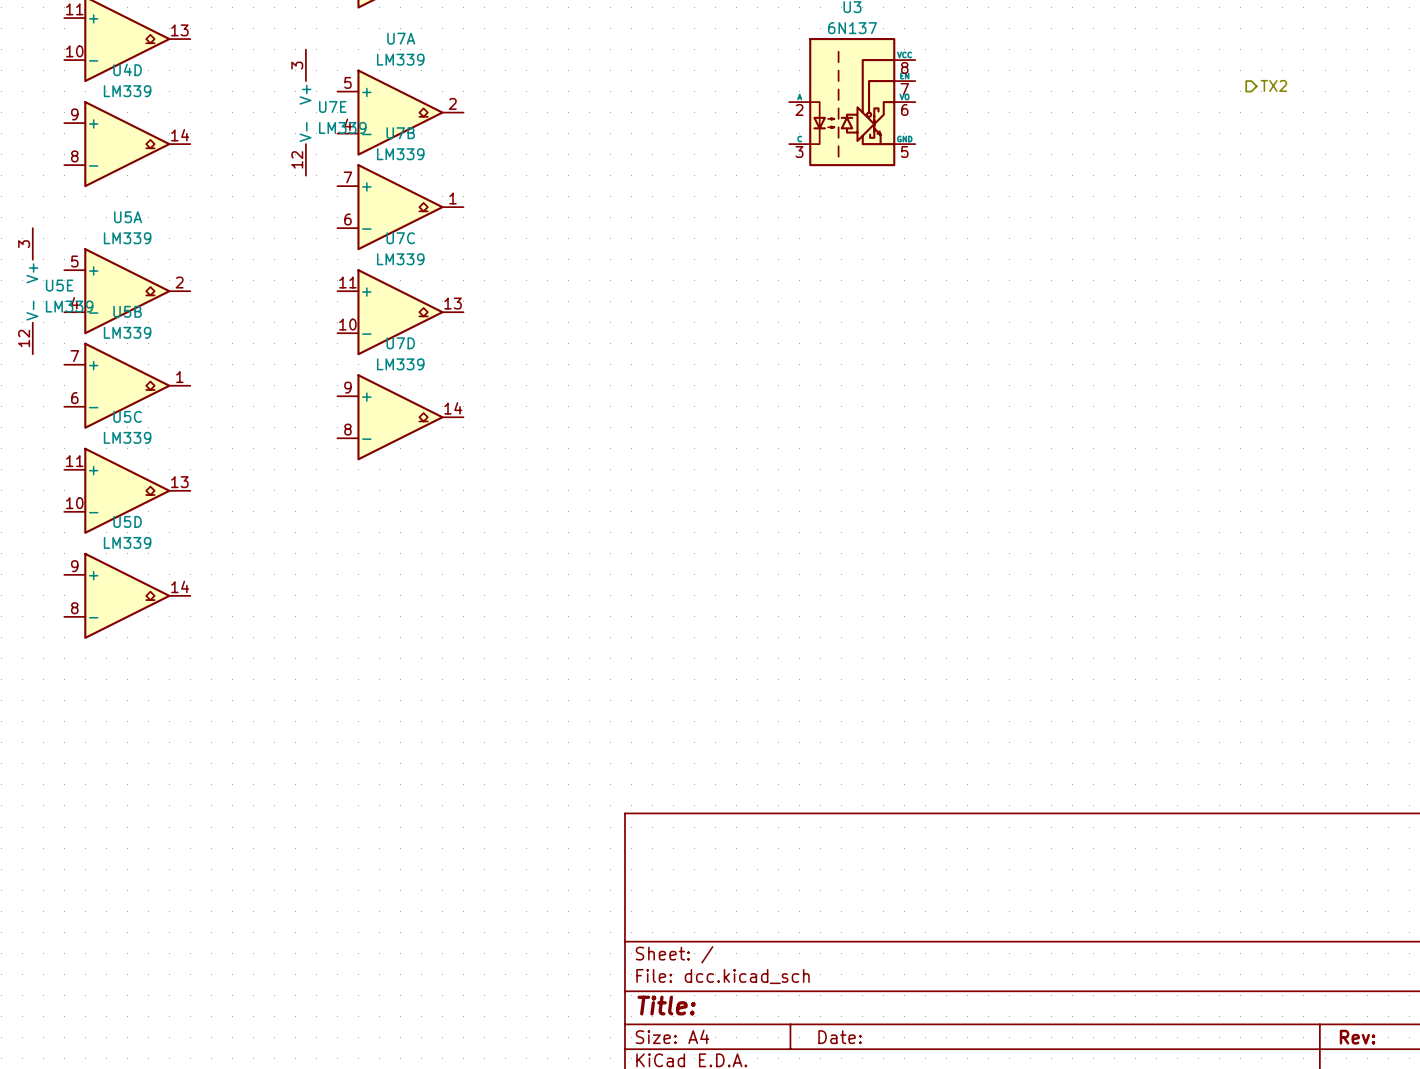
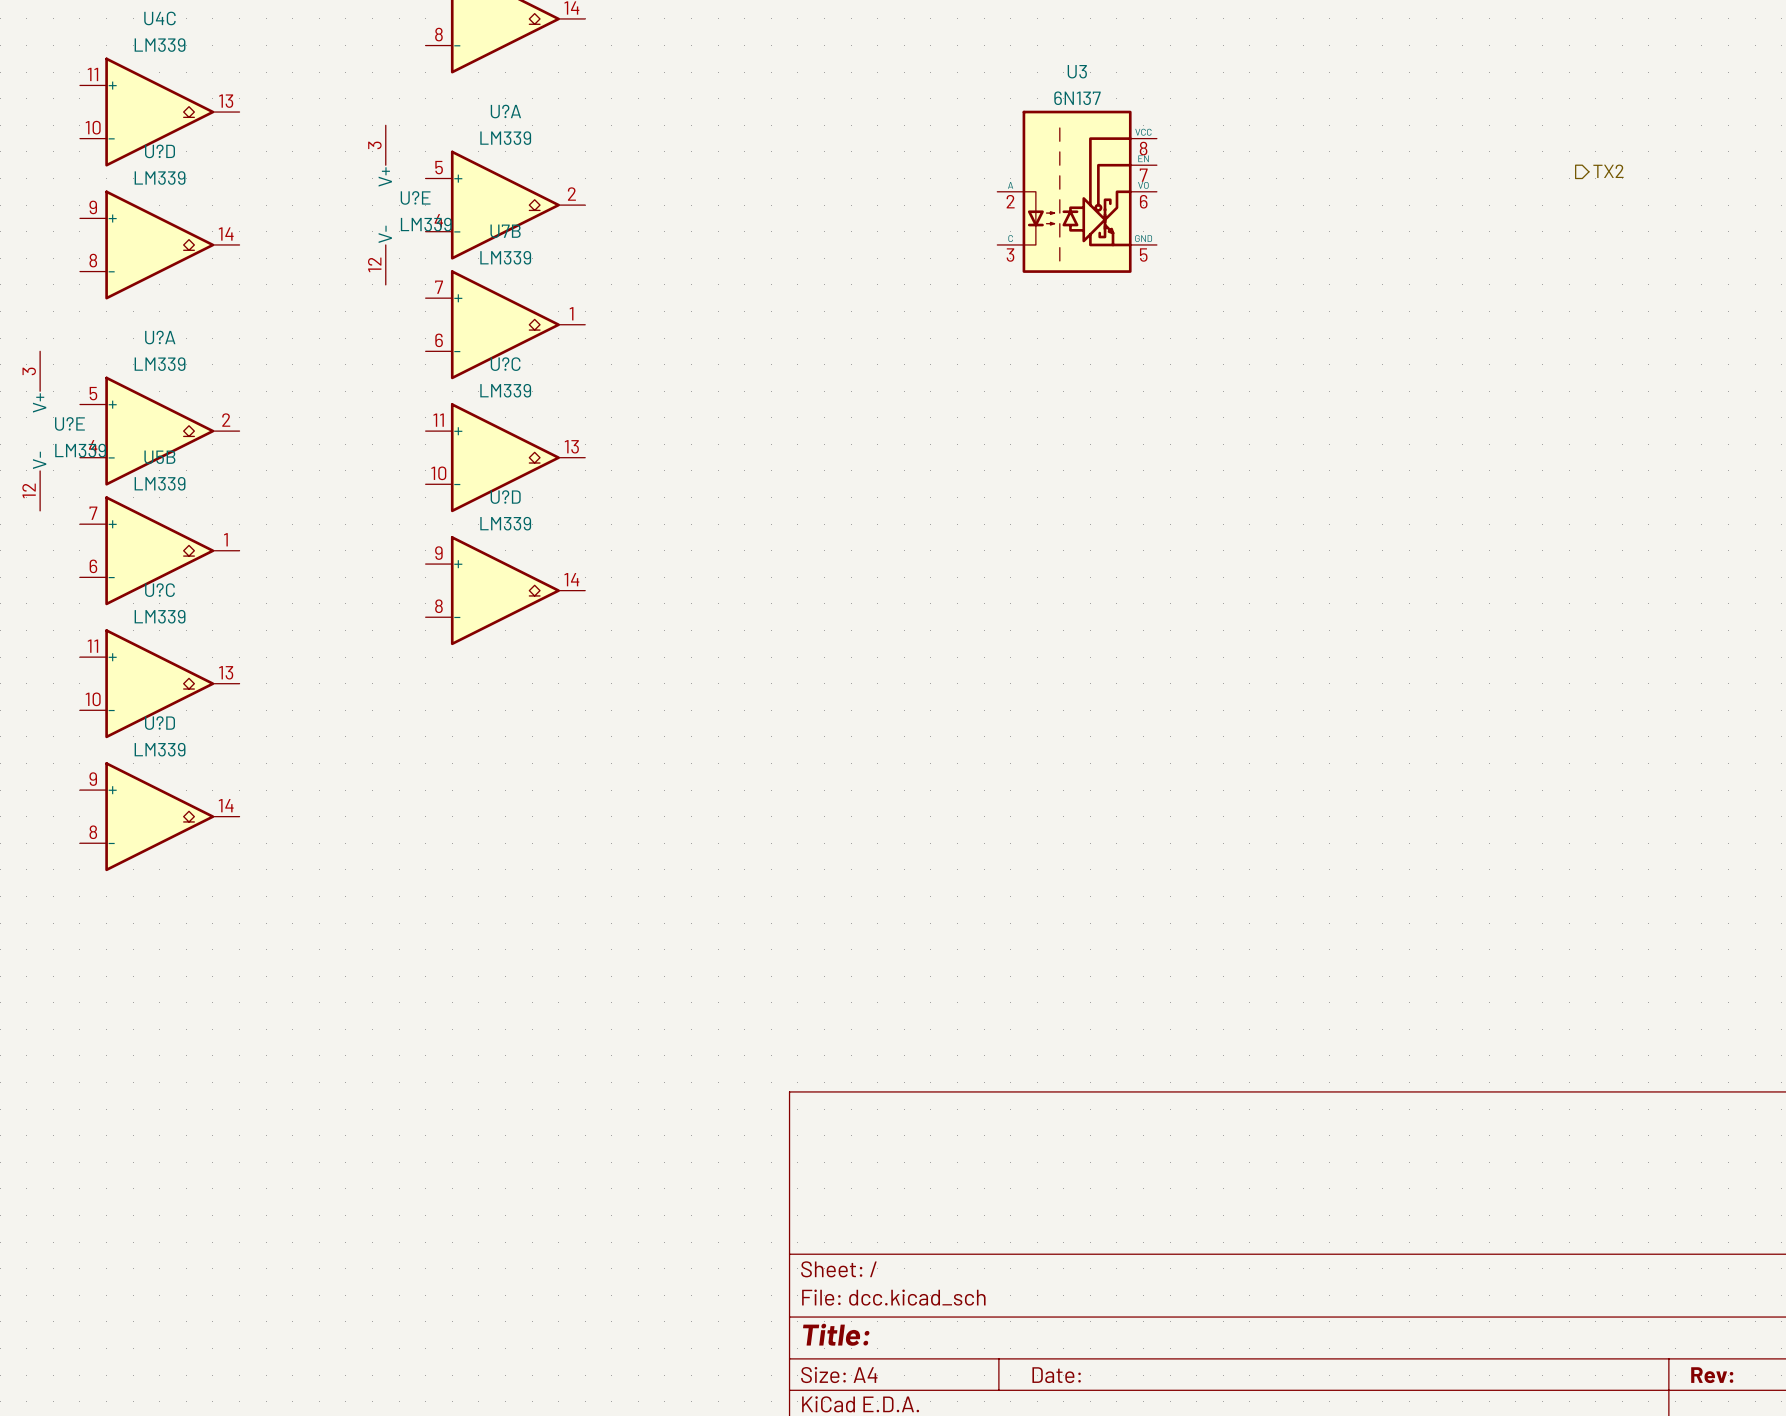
U7A name: U7A (401, 38) -> U?A (505, 111)
U4D name: U4D (127, 69) -> U?D (159, 151)
U7E name: U7E (332, 106) -> U?E (415, 197)
U5A name: U5A (128, 217) -> U?A (160, 337)
U7C name: U7C (400, 238) -> U?C (505, 364)
U5E name: U5E (59, 285) -> U?E (69, 423)
U7D name: U7D (400, 343) -> U?D (505, 497)
U5C name: U5C (127, 416) -> U?C (159, 590)
U5D name: U5D (127, 521) -> U?D (159, 723)

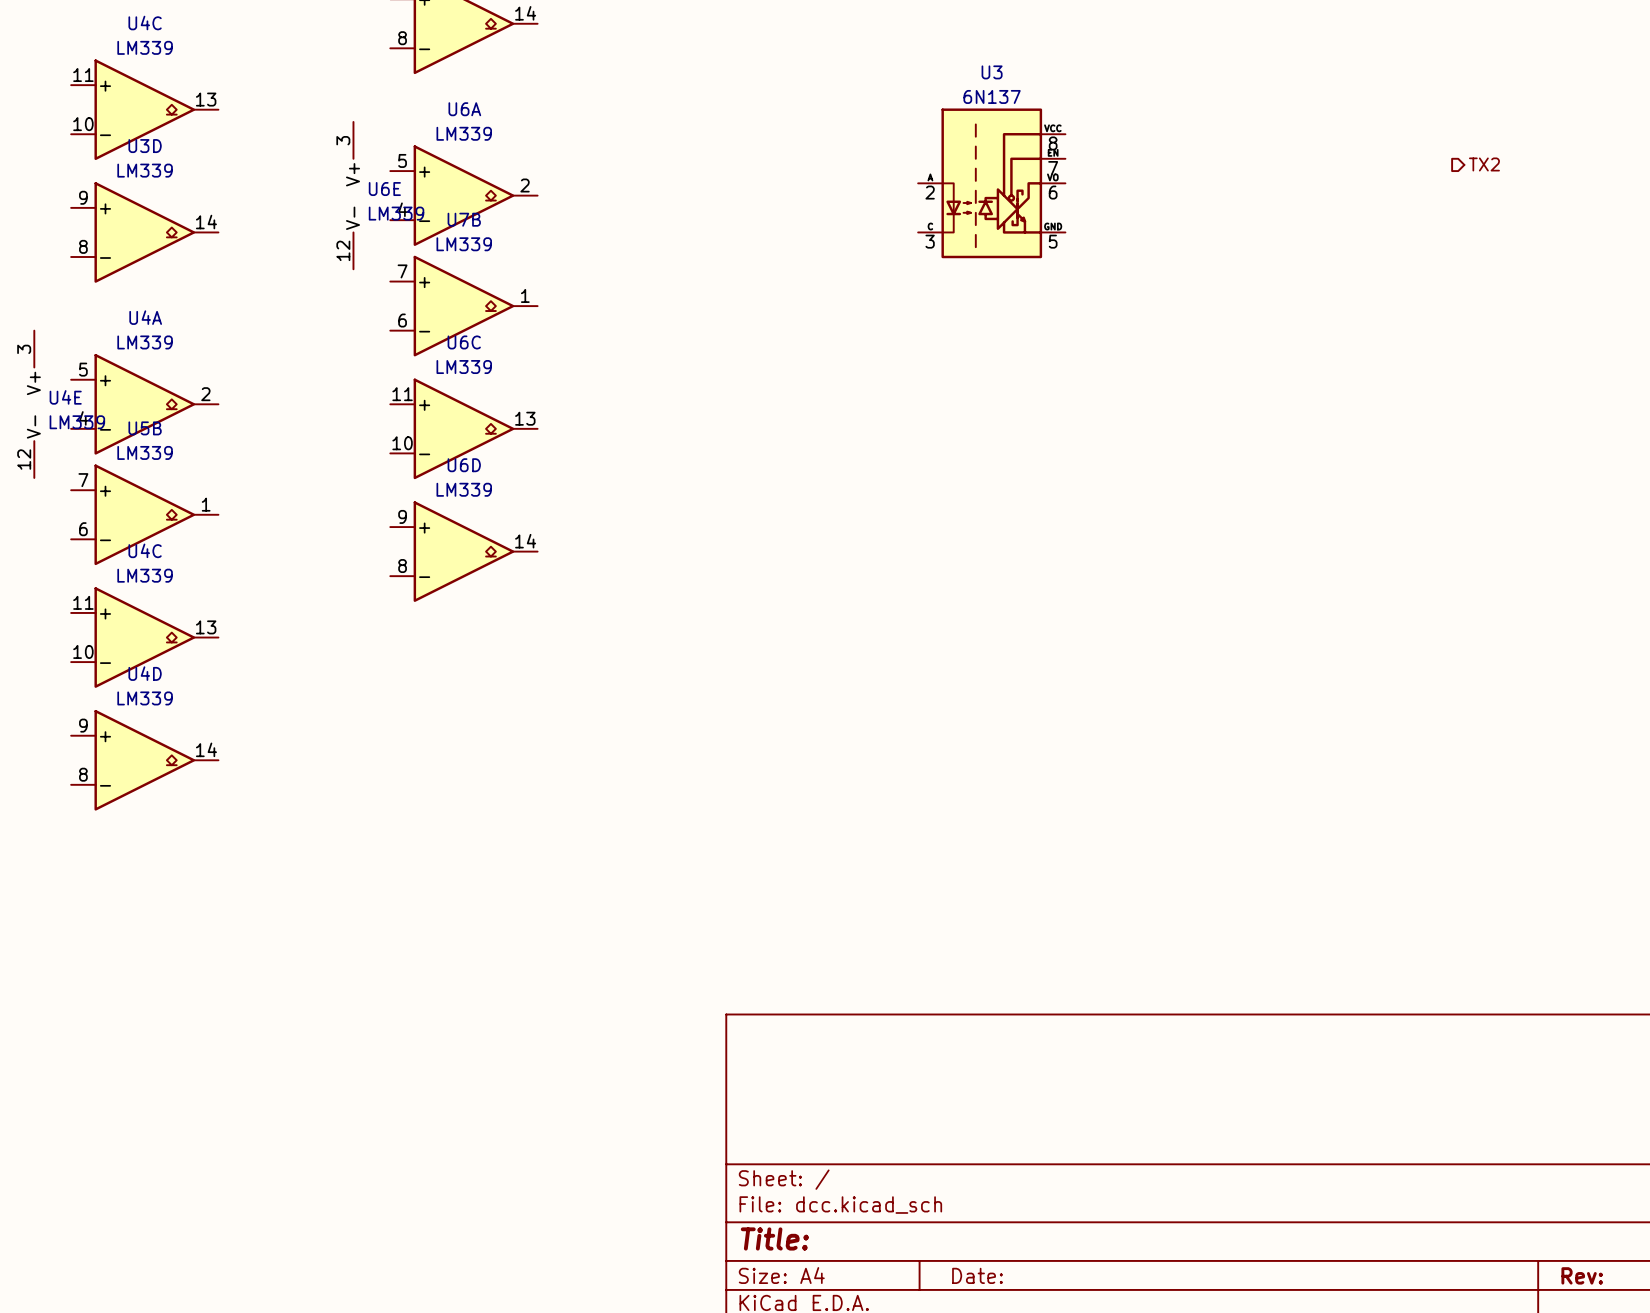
U?A name: U?A (505, 111) -> U6A (464, 109)
U?D name: U?D (159, 151) -> U3D (145, 146)
U?E name: U?E (415, 197) -> U6E (384, 189)
U?A name: U?A (160, 337) -> U4A (145, 317)
U?C name: U?C (505, 364) -> U6C (464, 342)
U?E name: U?E (69, 423) -> U4E (65, 397)
U?D name: U?D (505, 497) -> U6D (464, 465)
U?C name: U?C (159, 590) -> U4C (145, 550)
U?D name: U?D (159, 723) -> U4D (145, 673)

